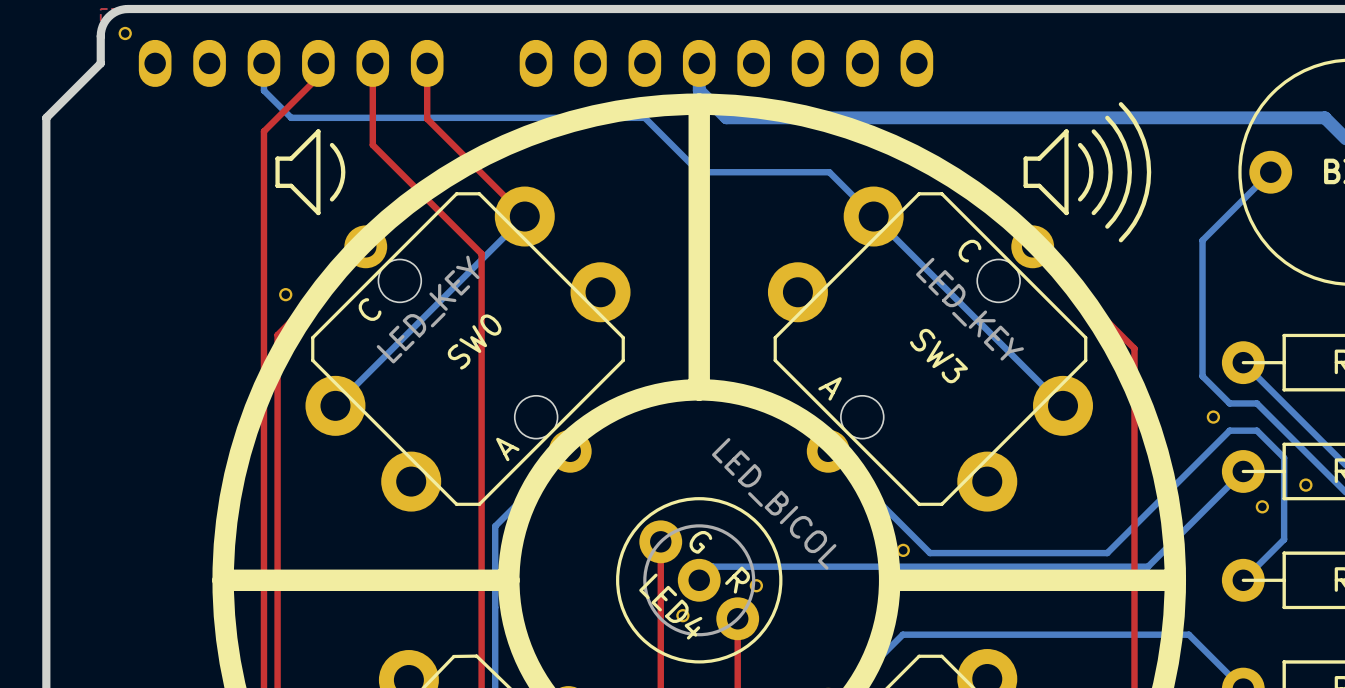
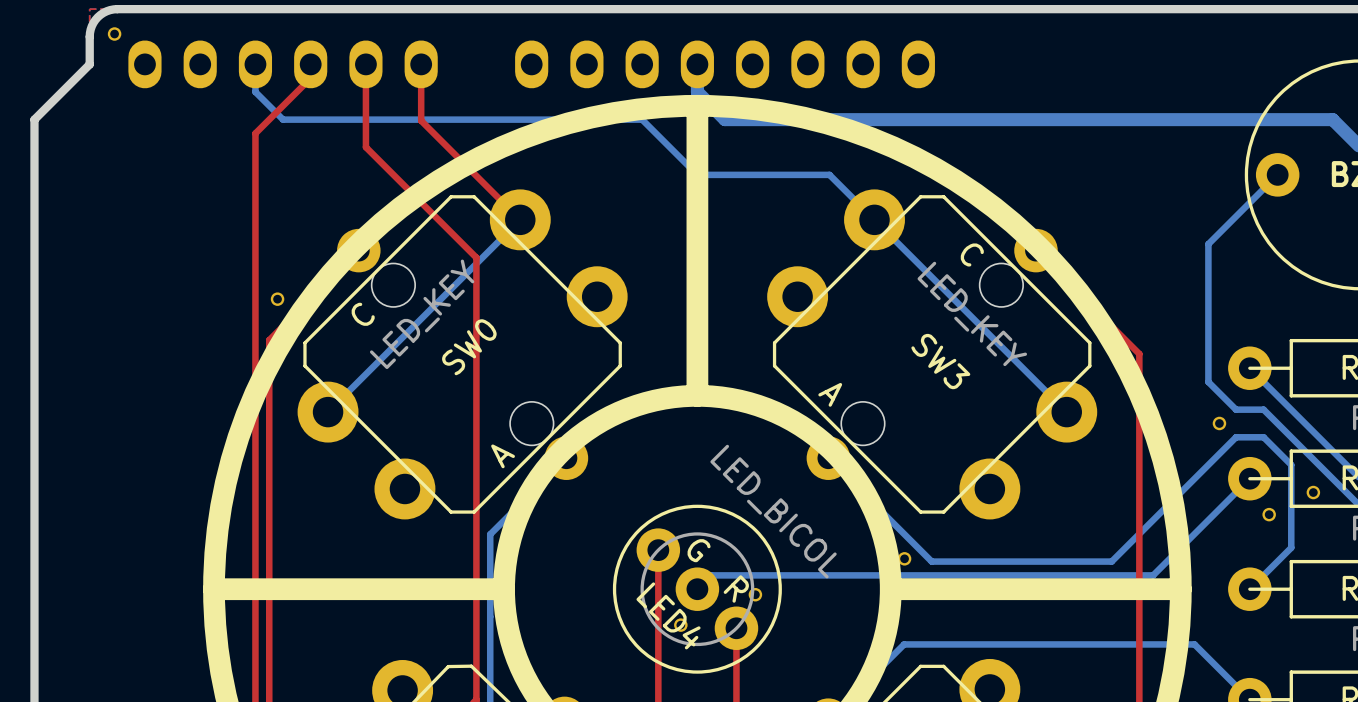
line: (1120, 104) (1139, 130) (1146, 150) (1149, 172) (1146, 193) (1139, 213) (1120, 240) -> none
line: (1107, 117) (1123, 142) (1129, 172) (1123, 201) (1107, 226) -> none
line: (318, 131) (291, 158) (277, 158) (277, 185) (291, 185) (318, 213) (318, 131) -> none
line: (1066, 131) (1039, 158) (1025, 158) (1025, 185) (1039, 185) (1066, 213) (1066, 131) -> none
line: (1093, 131) (1106, 150) (1110, 172) (1106, 194) (1093, 213) -> none
line: (331, 145) (340, 157) (343, 172) (340, 186) (331, 199) -> none
line: (1080, 145) (1088, 157) (1091, 172) (1088, 186) (1080, 199) -> none

